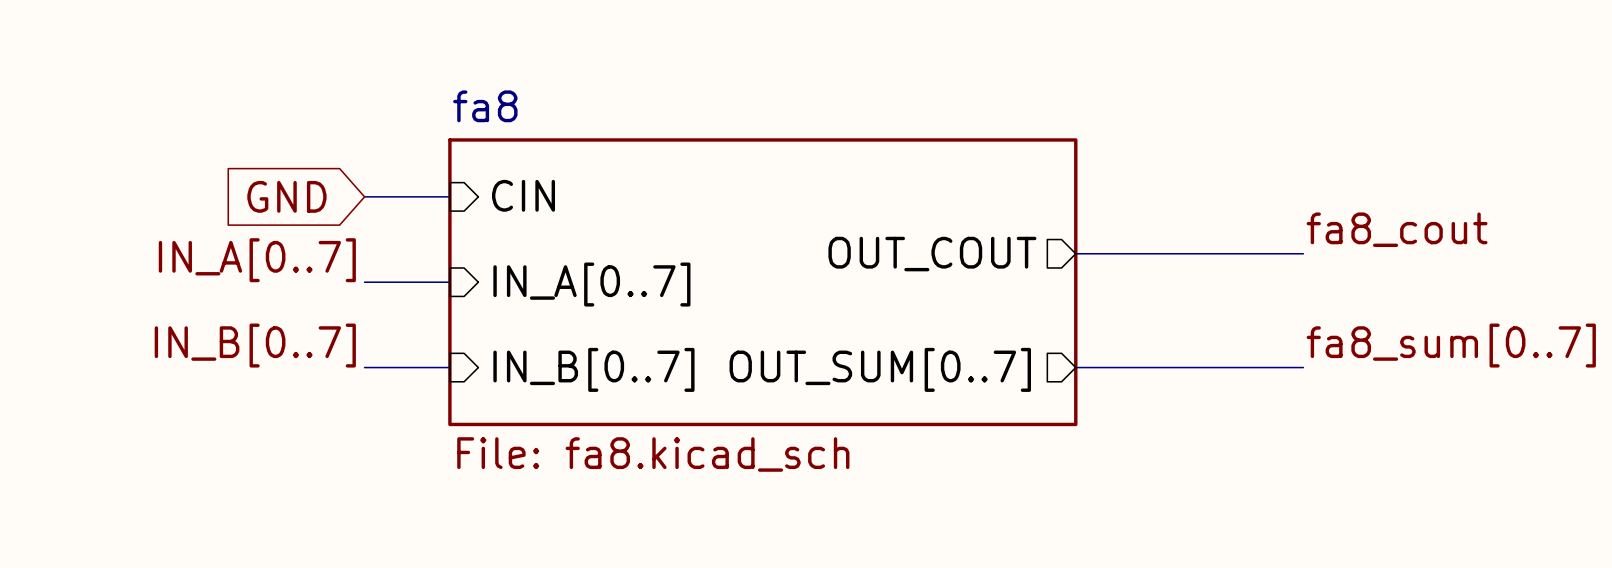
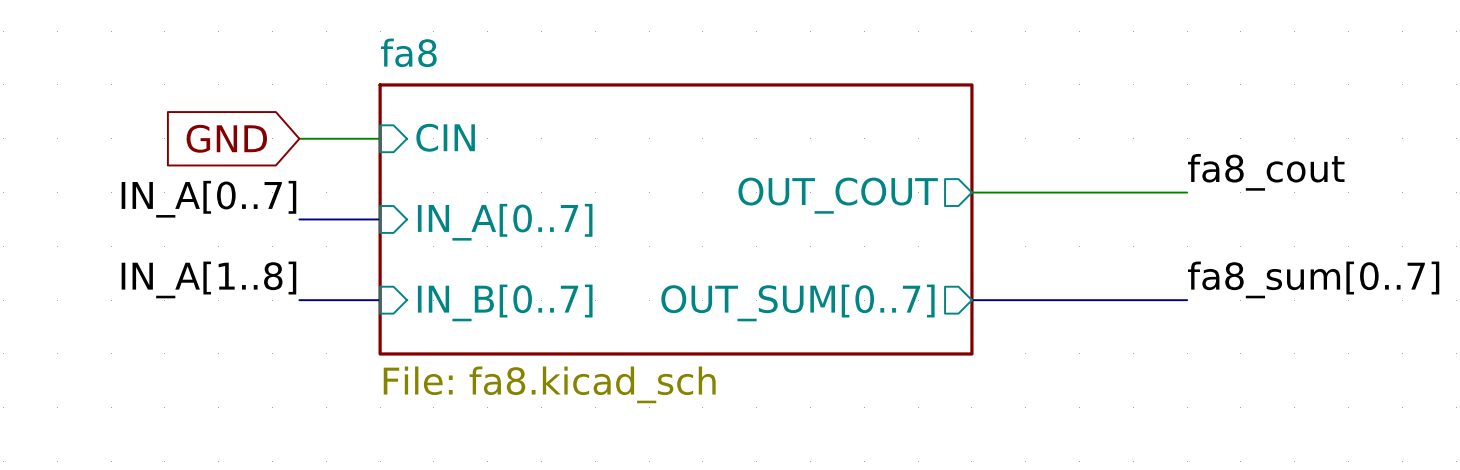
label: IN_B[0..7] (255, 345) -> IN_A[1..8] (208, 279)

